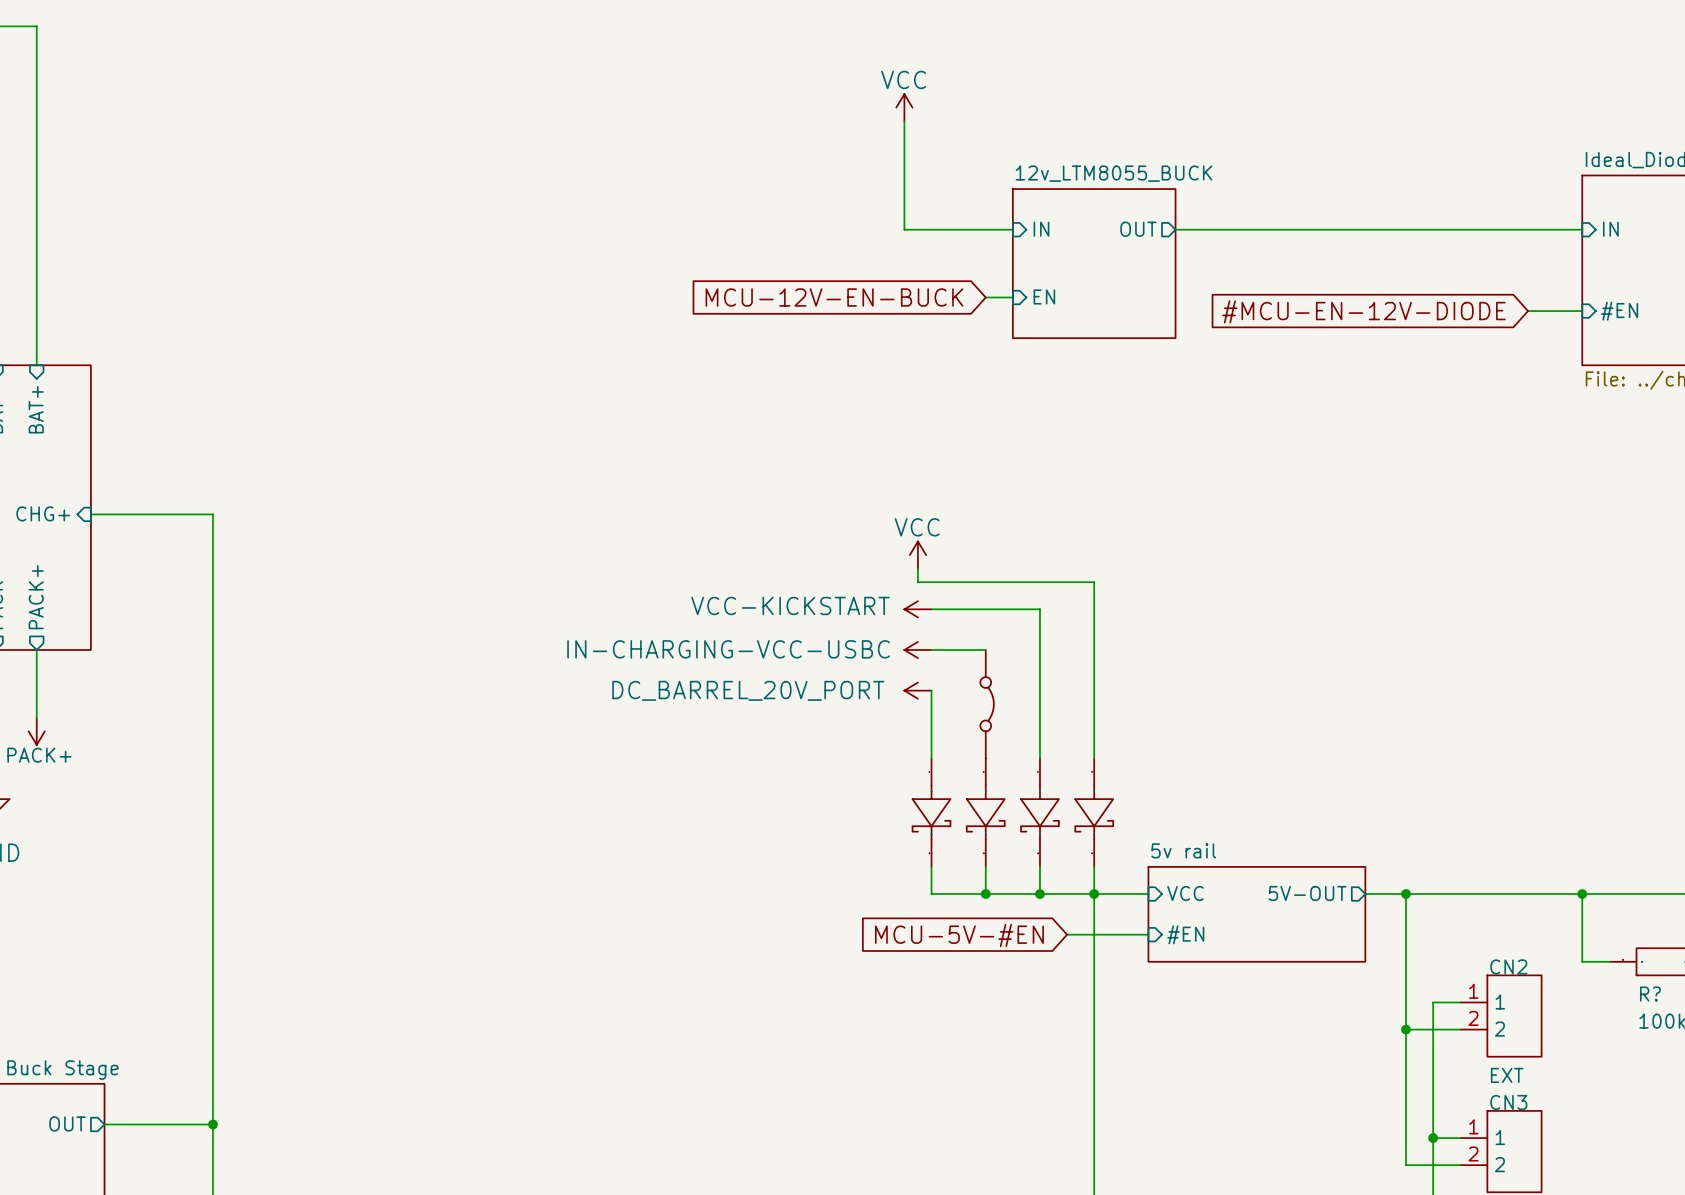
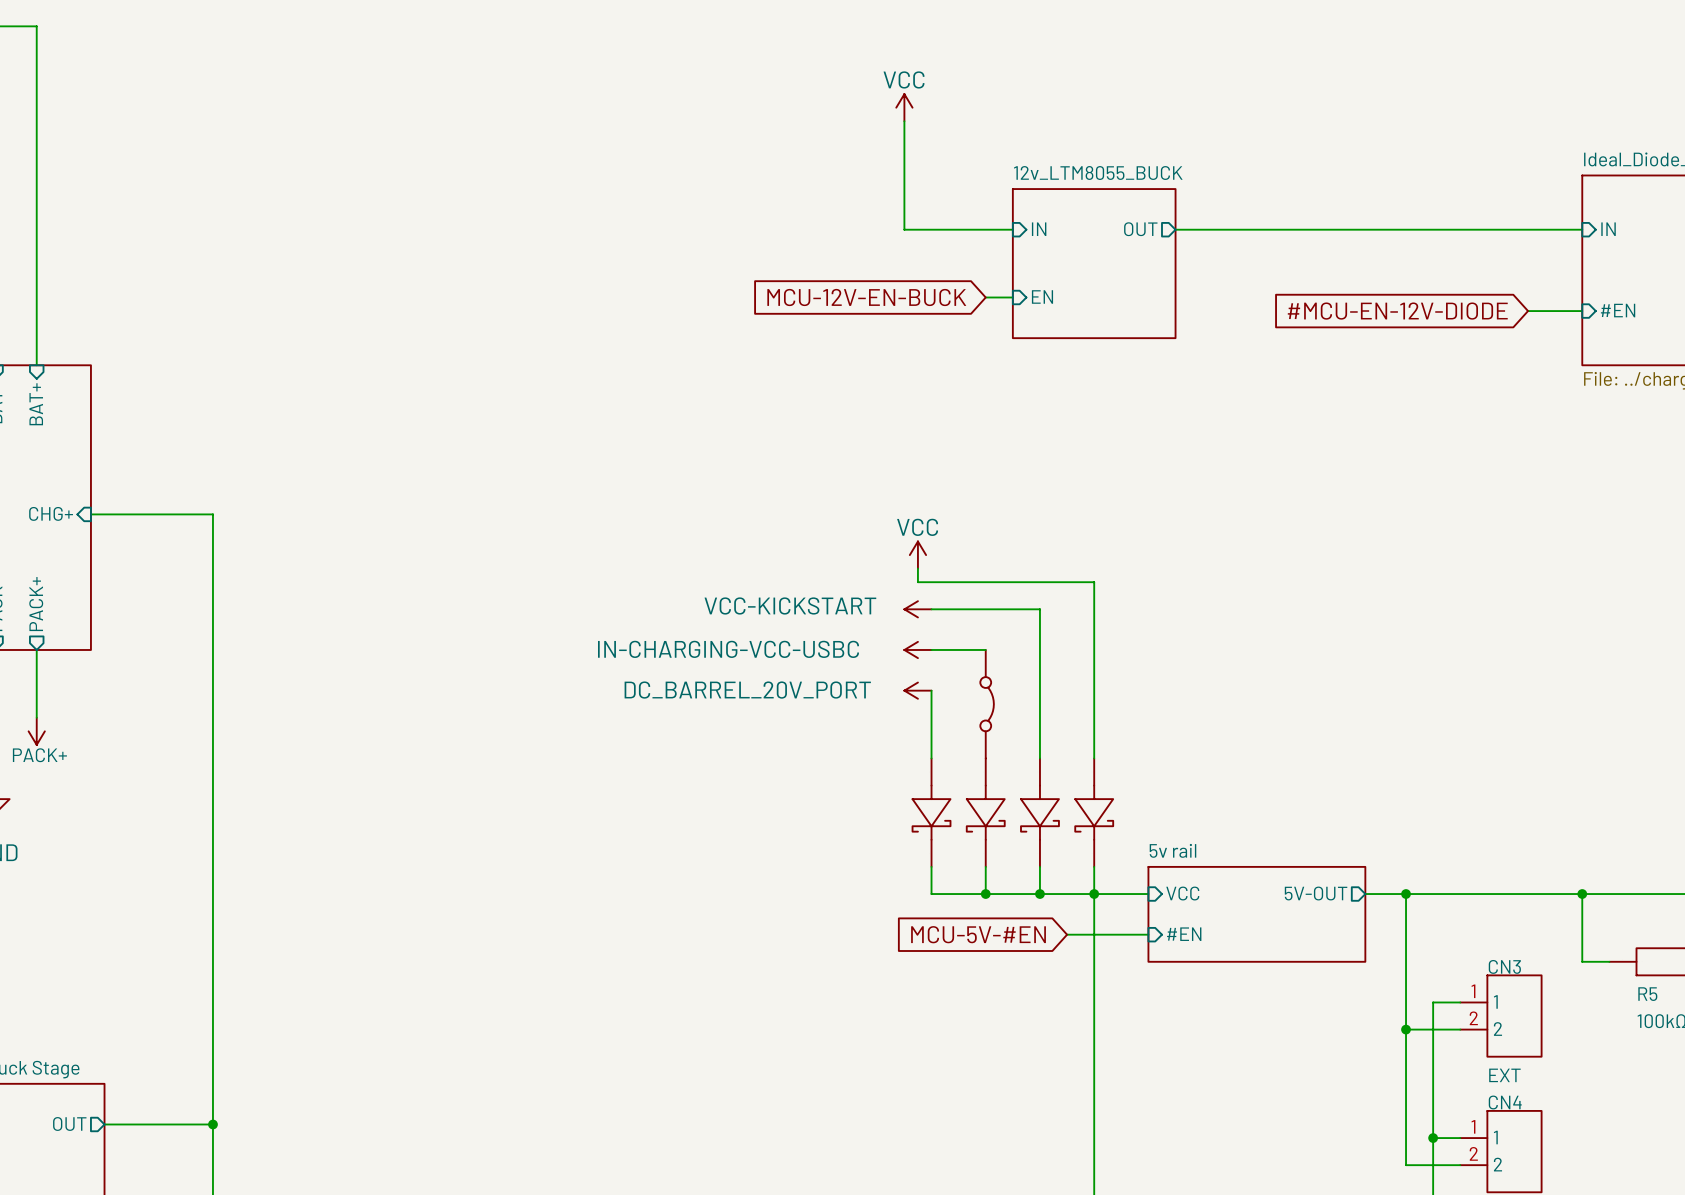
CN2 name: CN2 (1508, 966) -> CN3 (1504, 966)
R? name: R? (1650, 994) -> R5 (1647, 994)
CN3 name: CN3 (1508, 1102) -> CN4 (1505, 1102)

